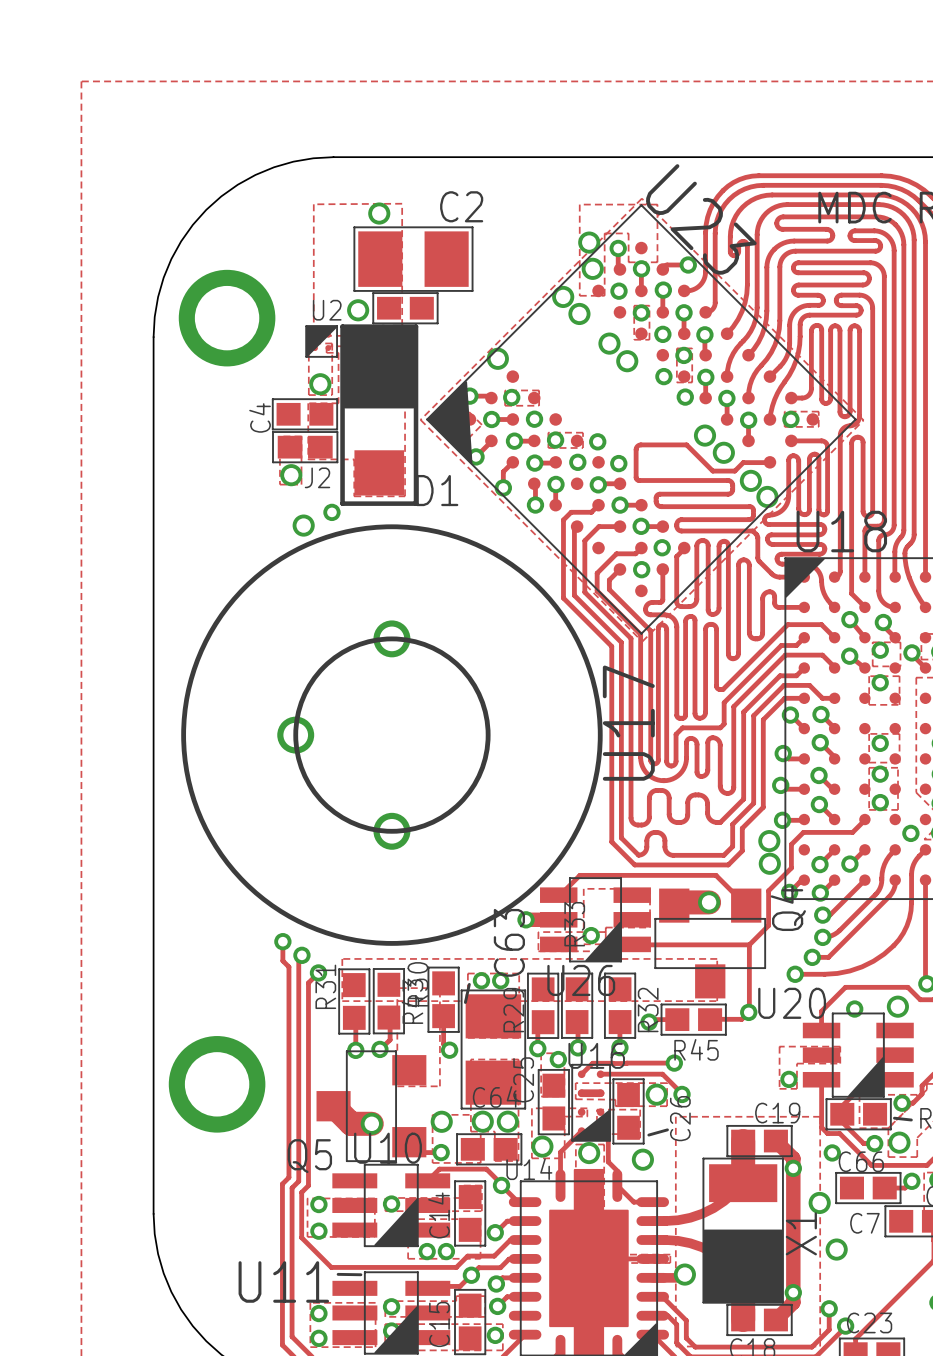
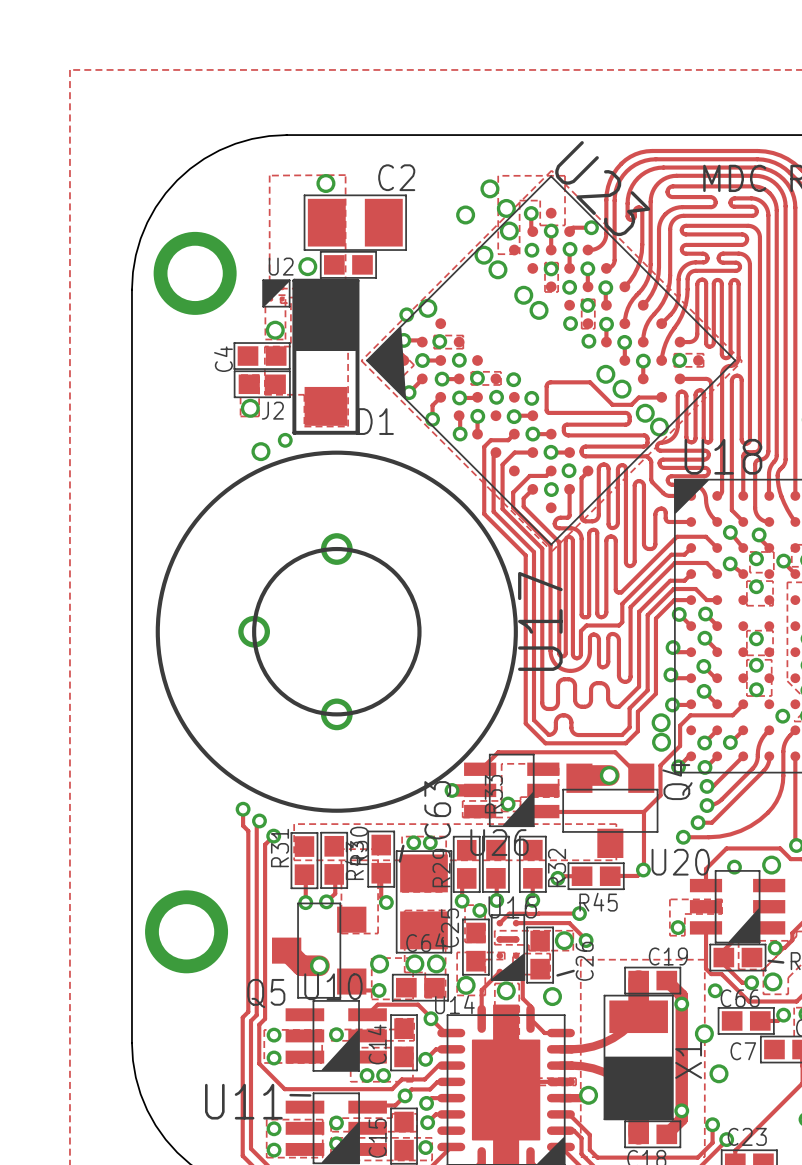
via: none -> (489, 188)
via: none -> (465, 214)
via: none -> (406, 314)

